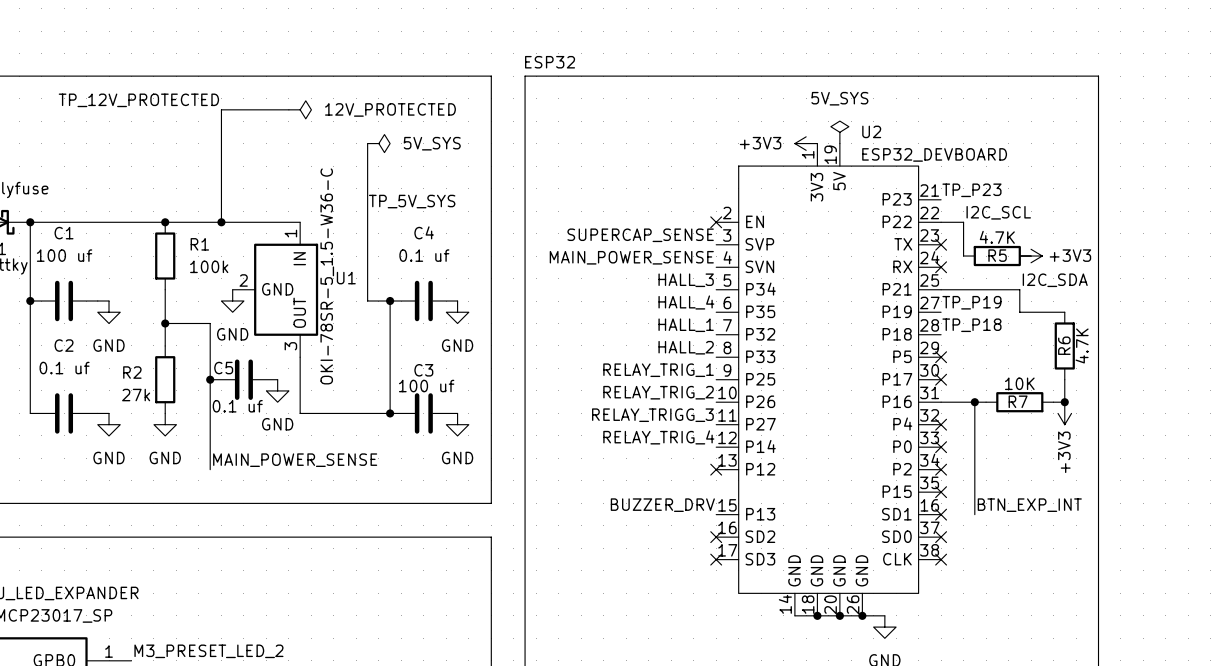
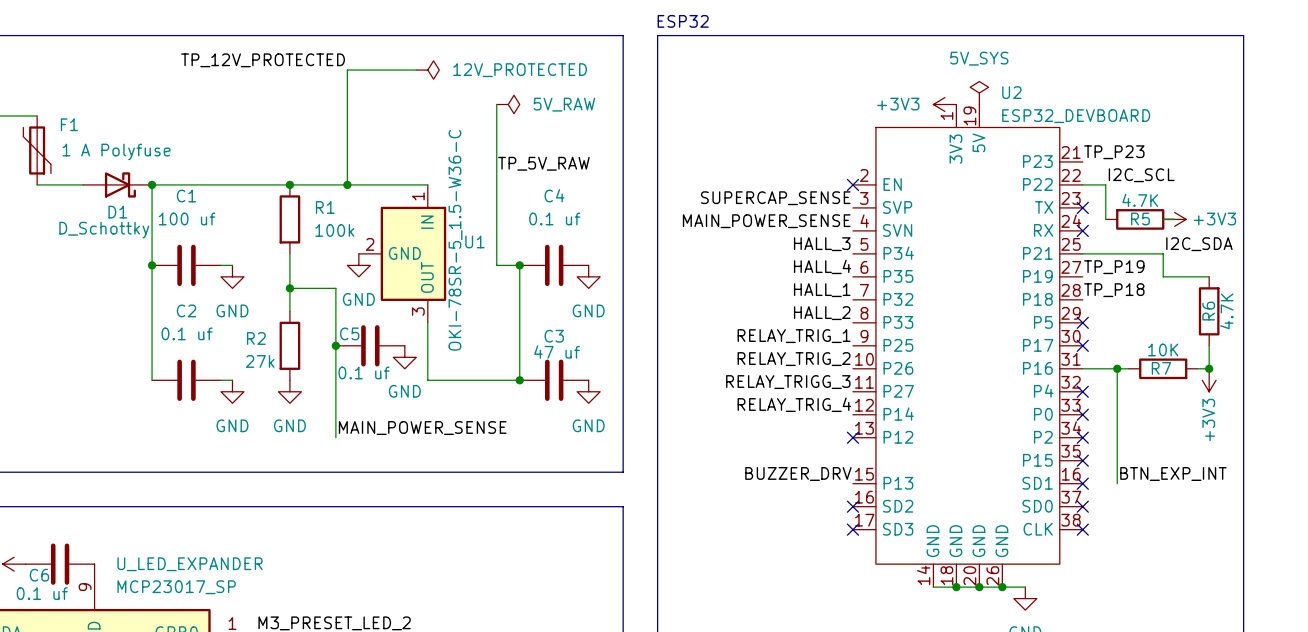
power symbol: 5V_SYS (378, 143) -> 5V_RAW (508, 104)
label: TP_5V_SYS (412, 201) -> TP_5V_RAW (543, 163)
C3 value: 100 uf (426, 386) -> 47 uf (557, 352)

